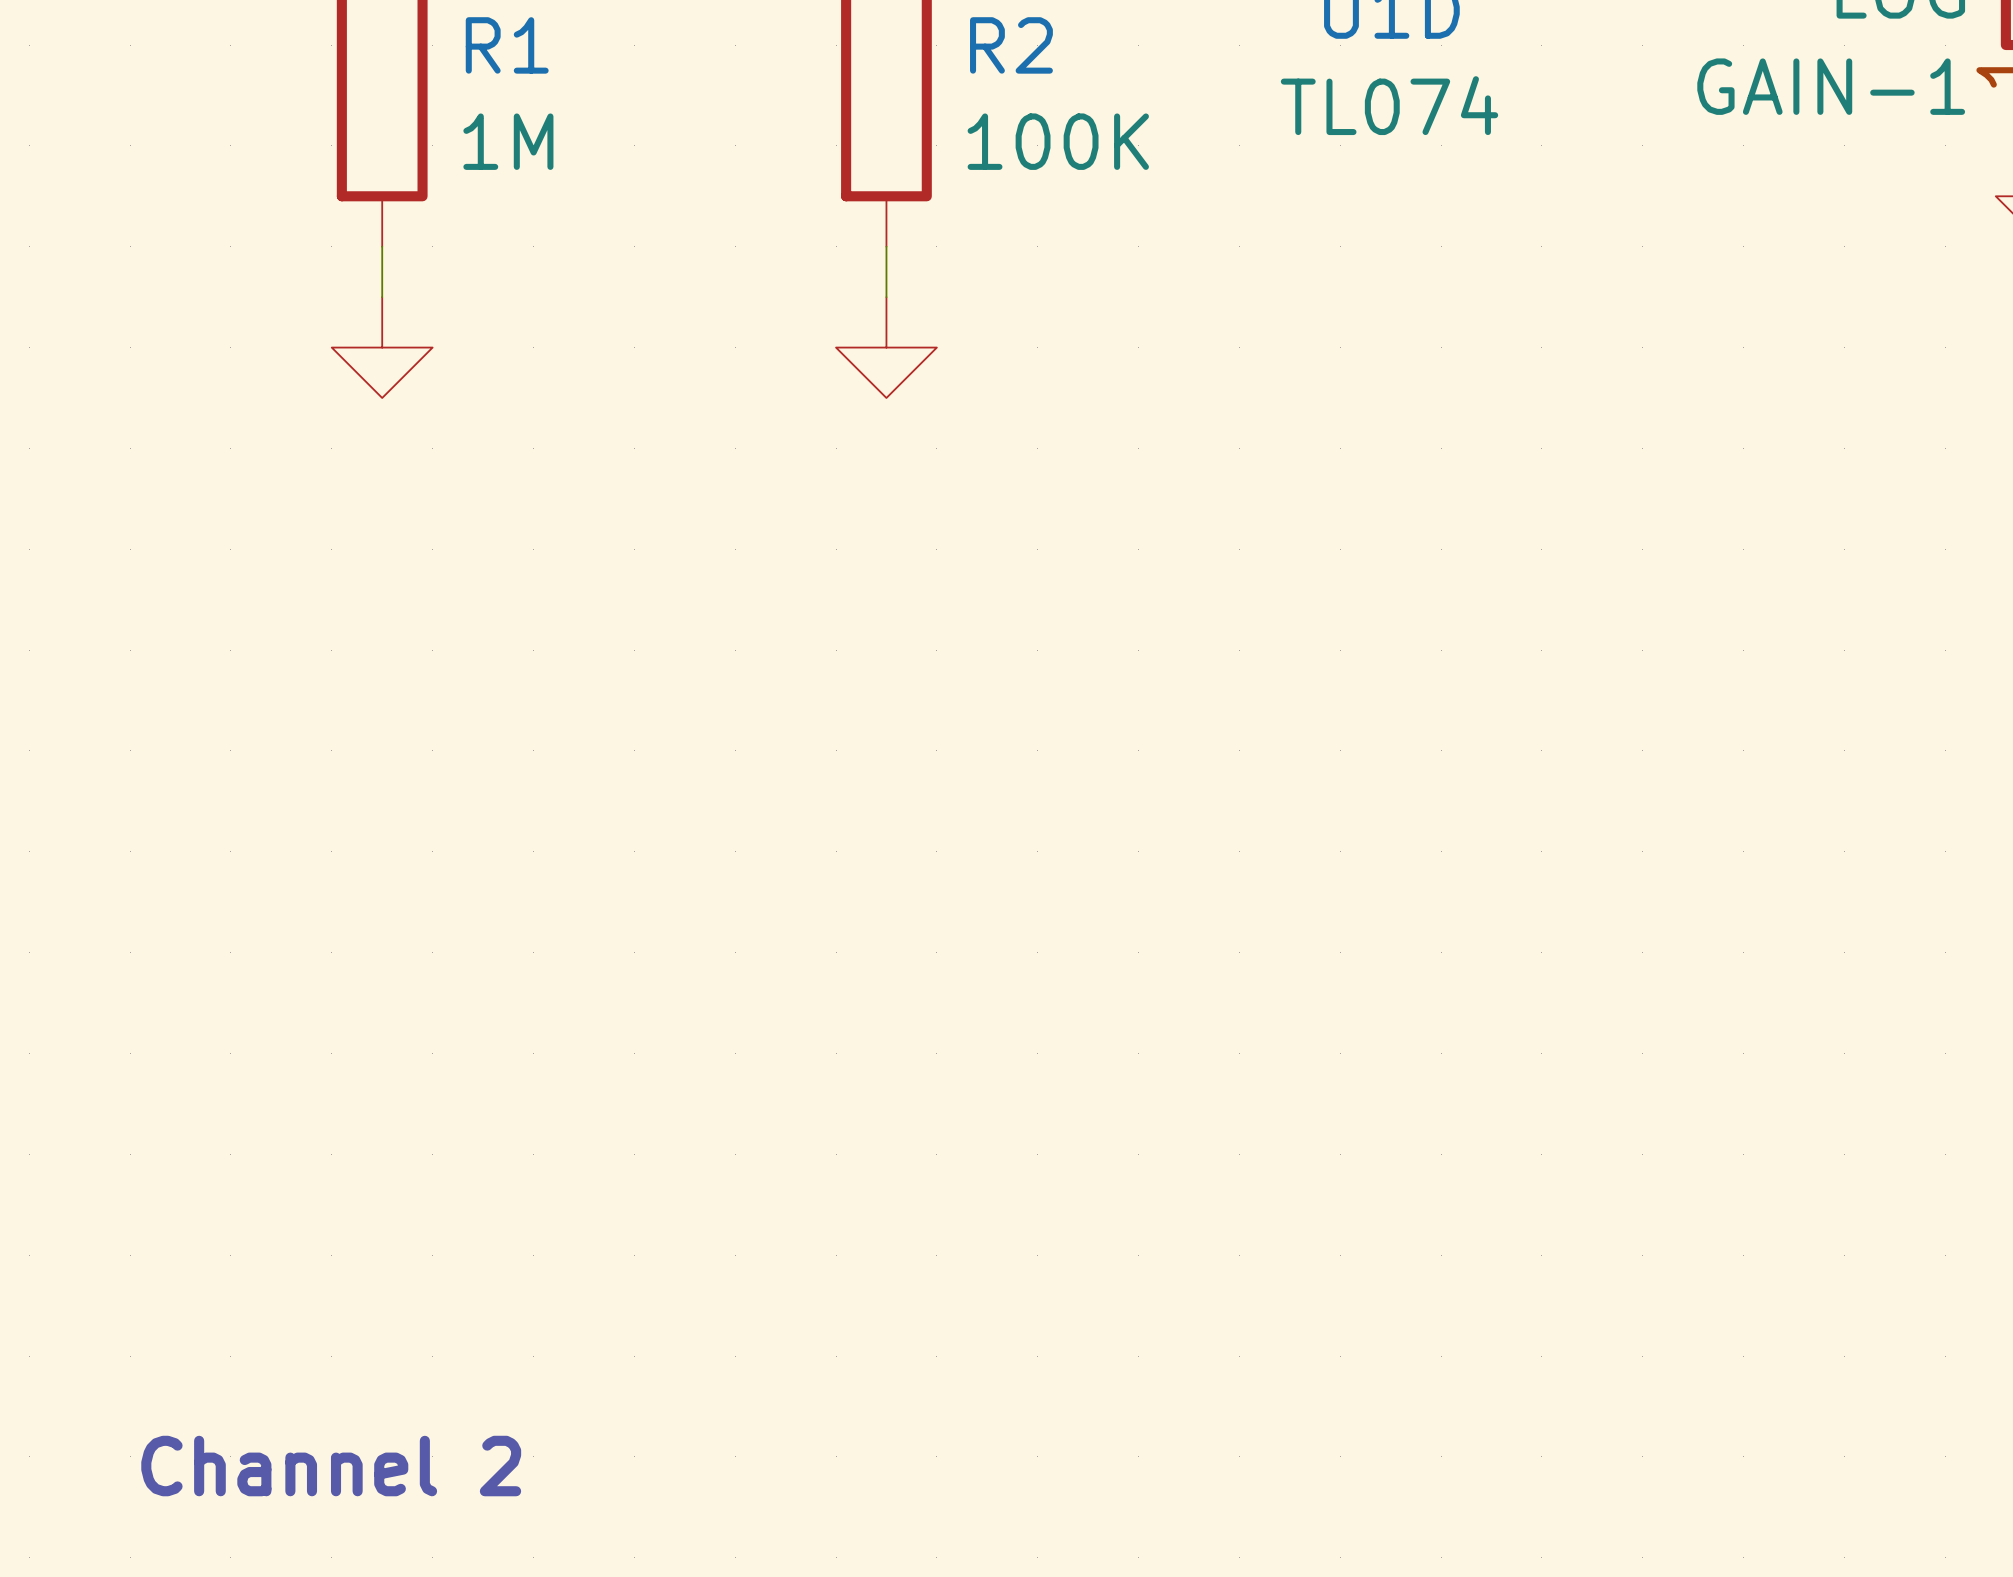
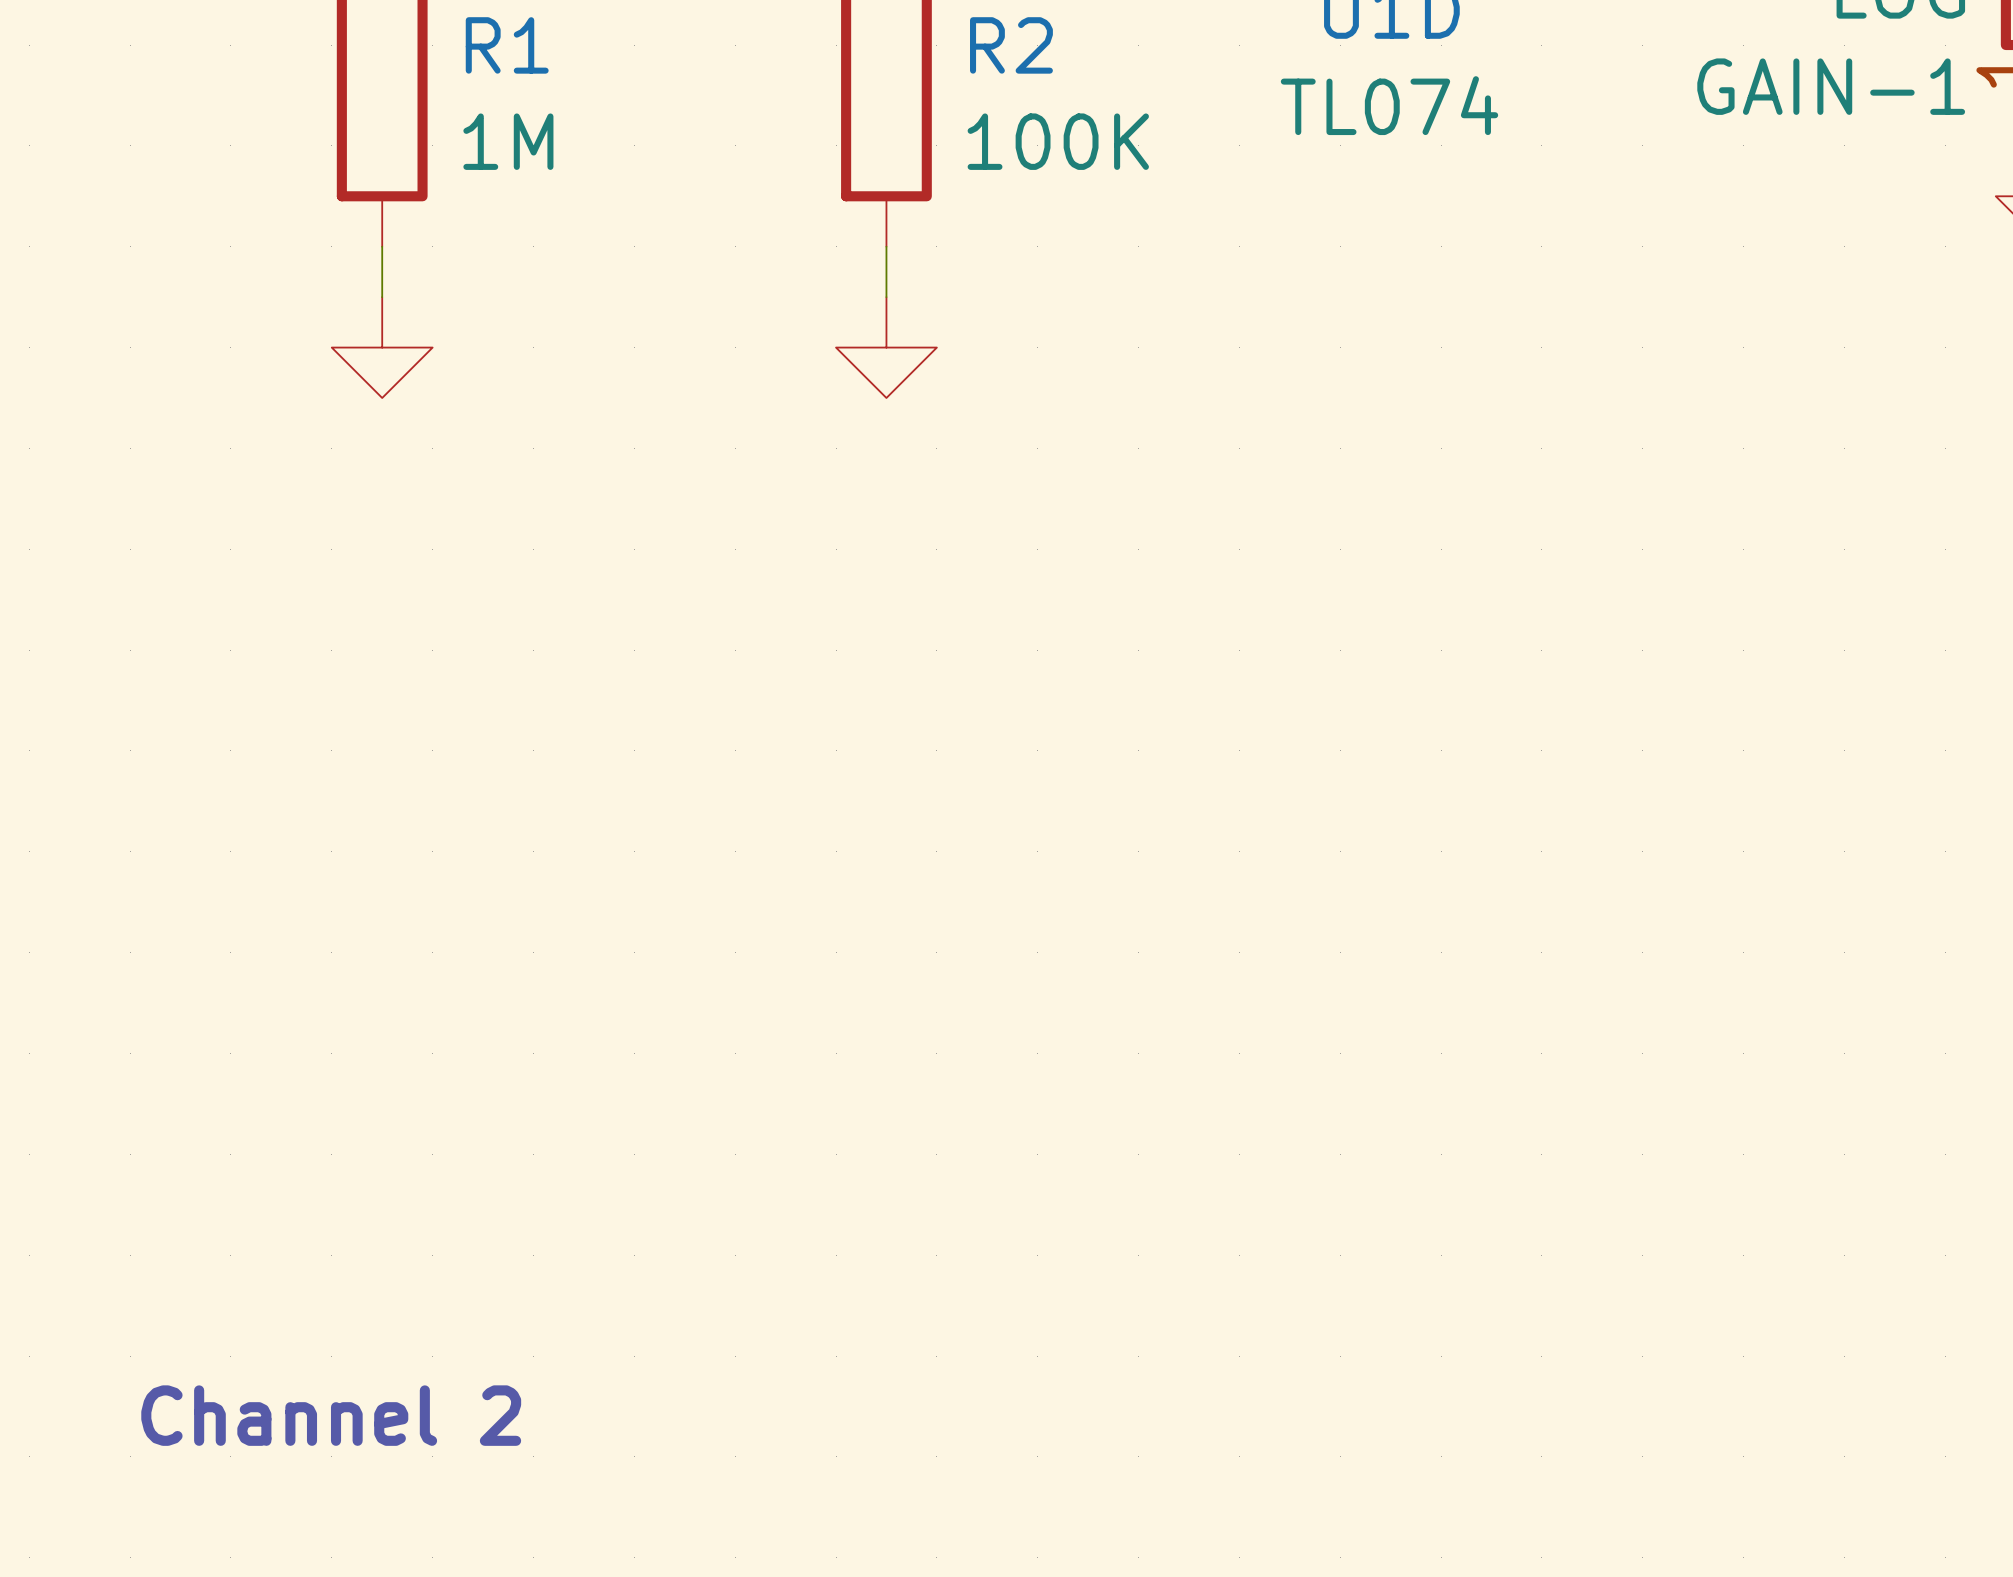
text position: Channel 2 (331, 1466) -> Channel 2 (331, 1415)

